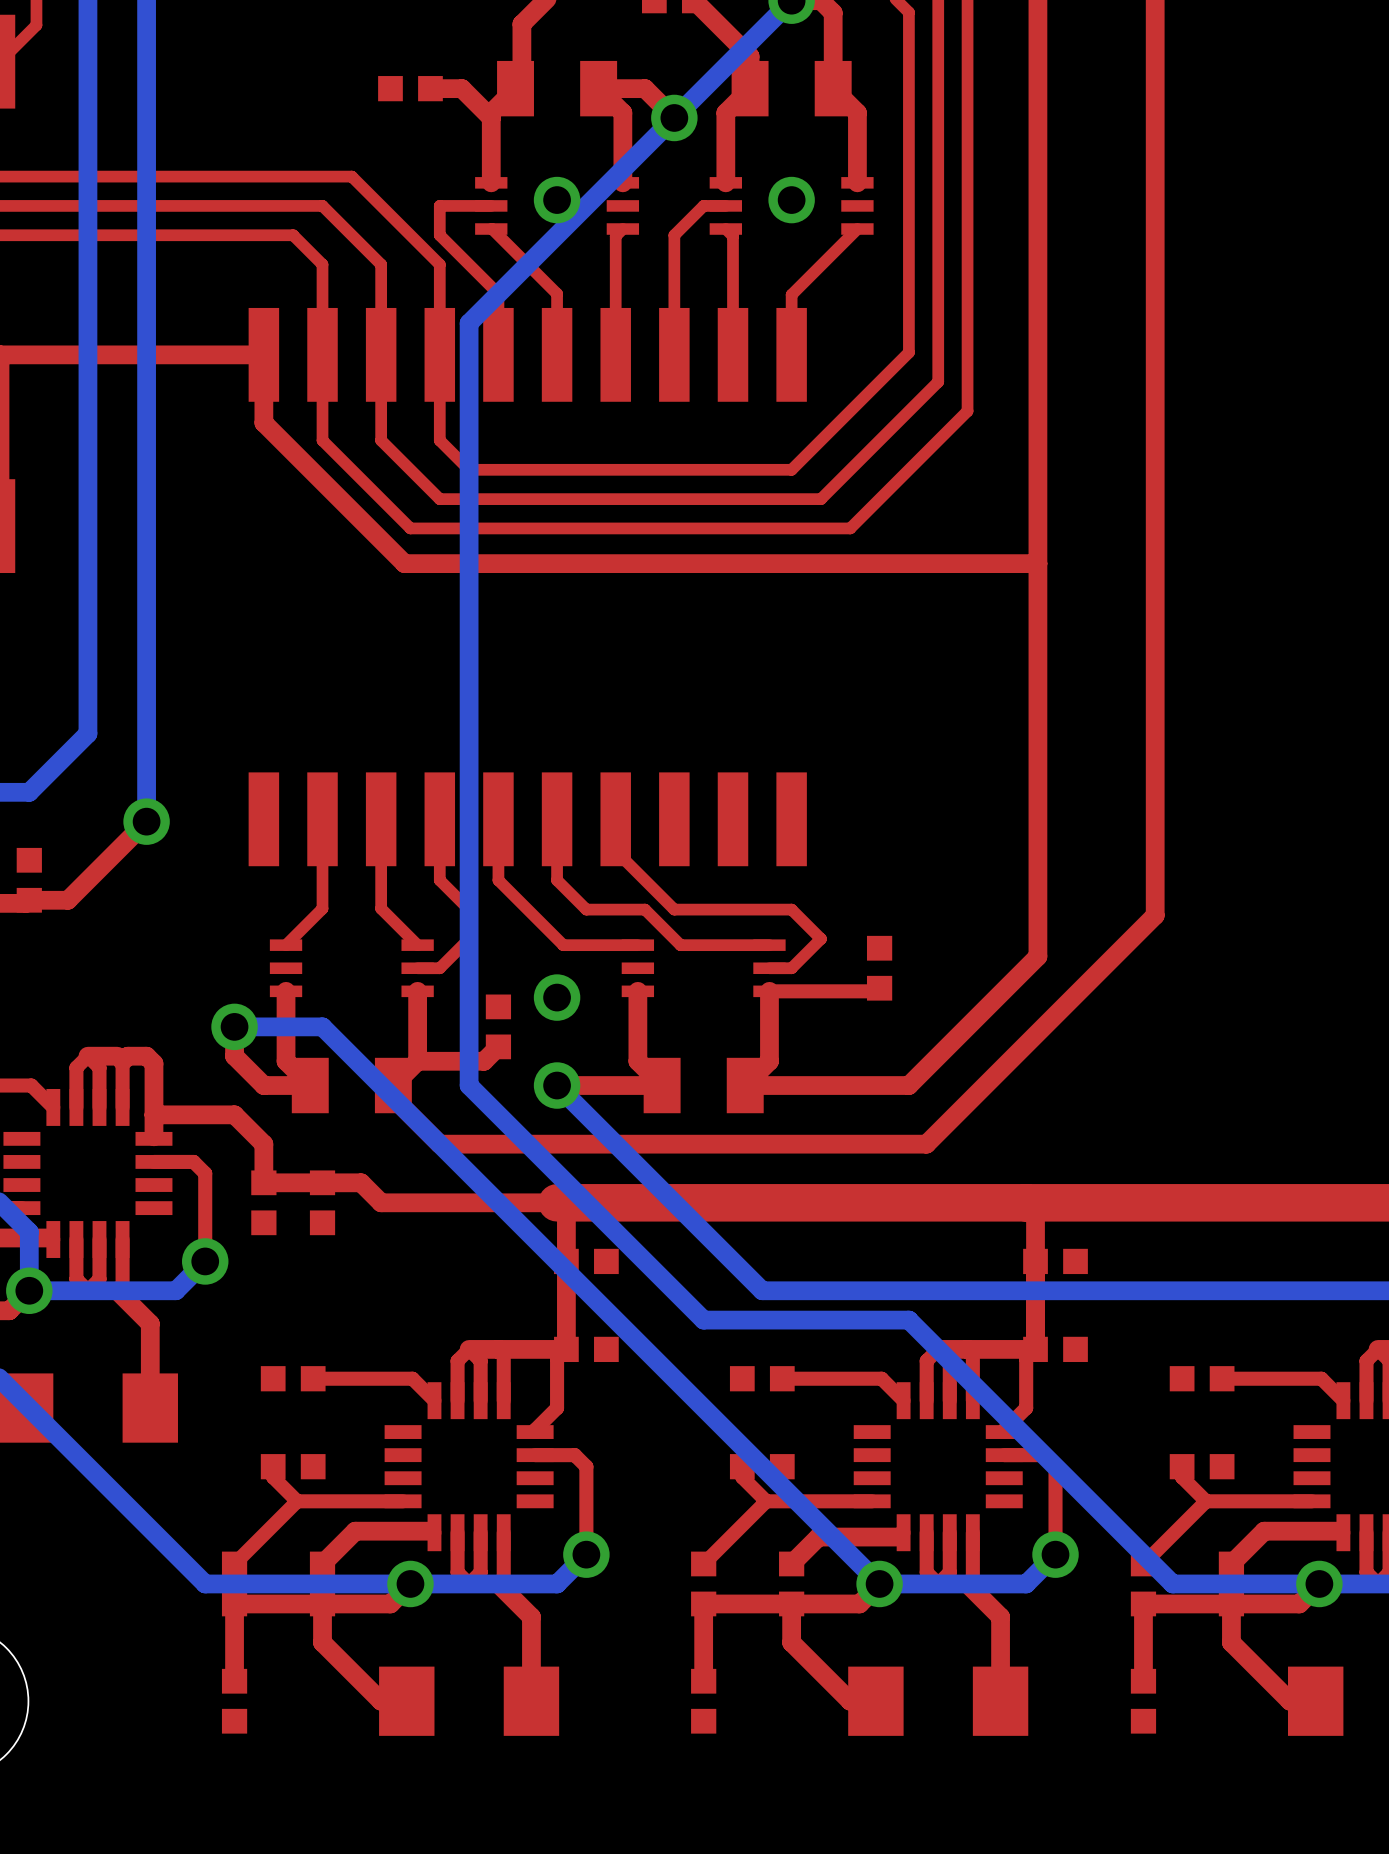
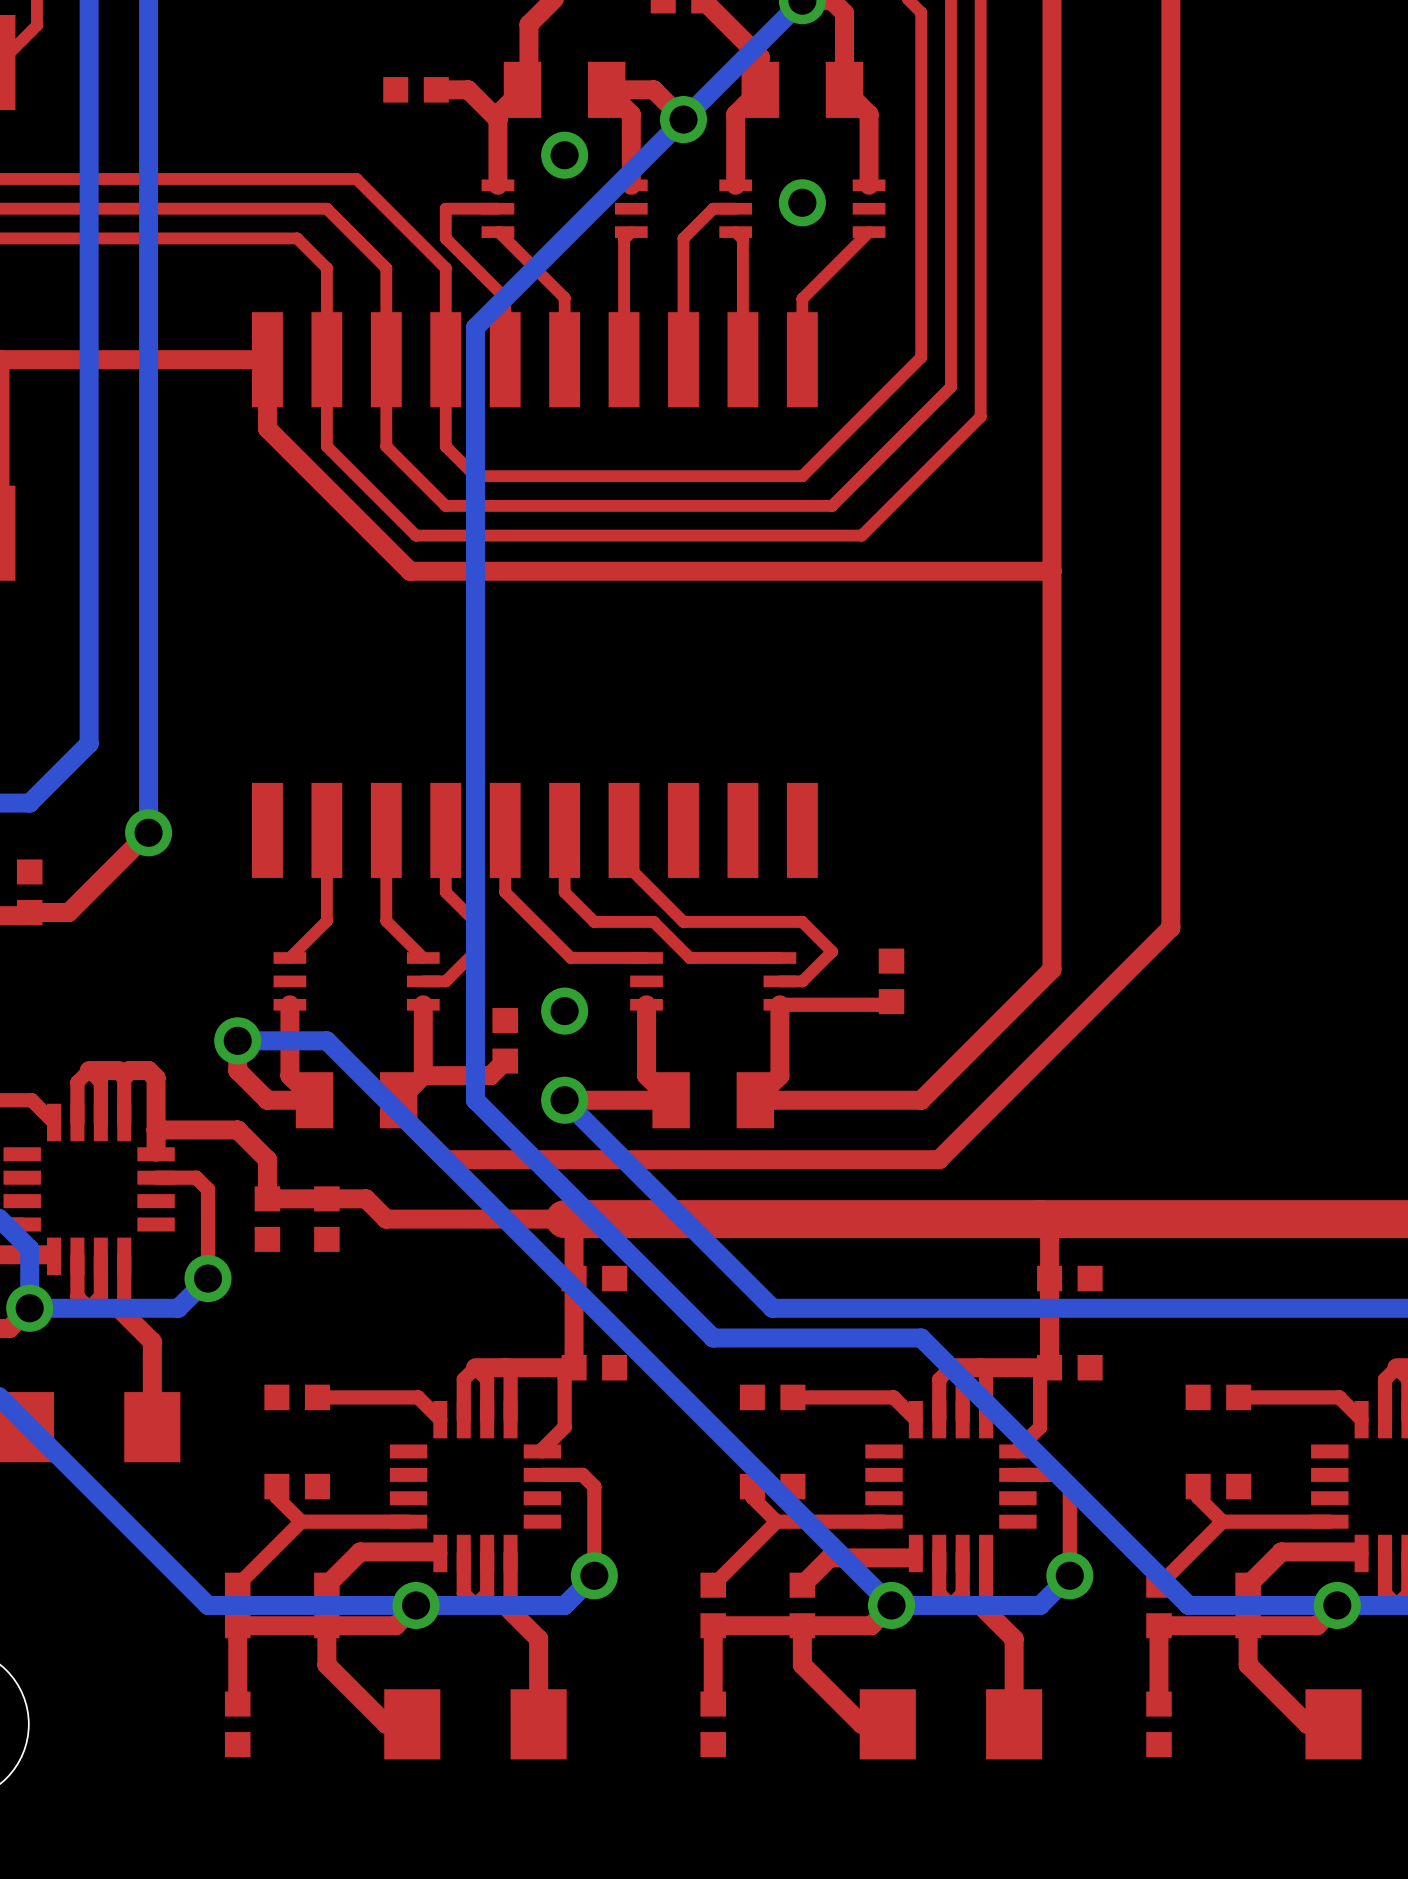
via position: (557, 200) -> (564, 155)

